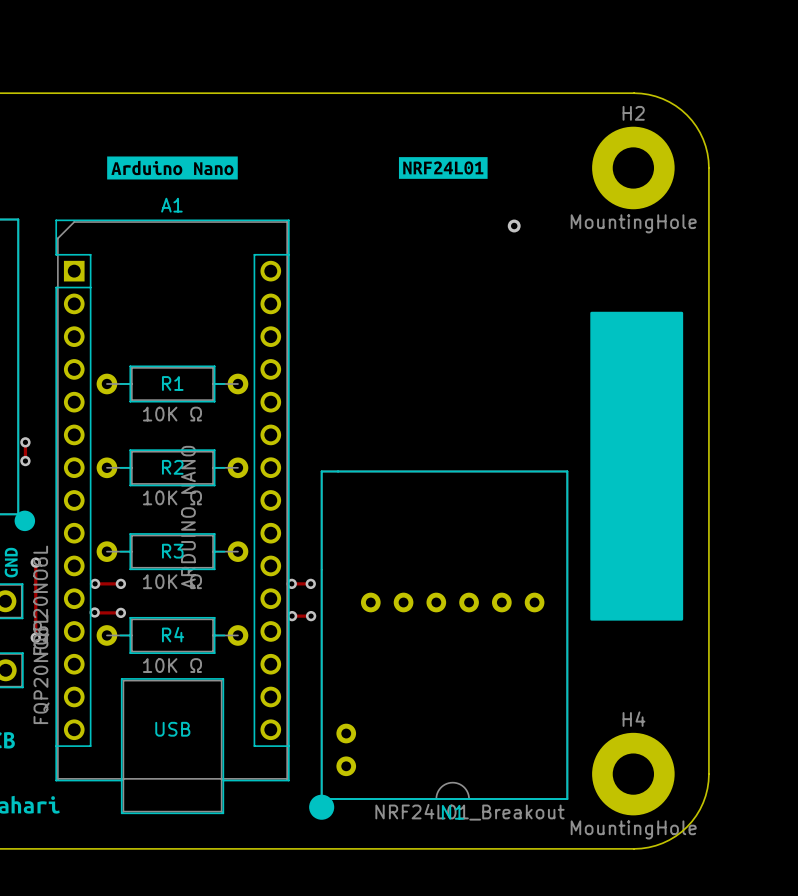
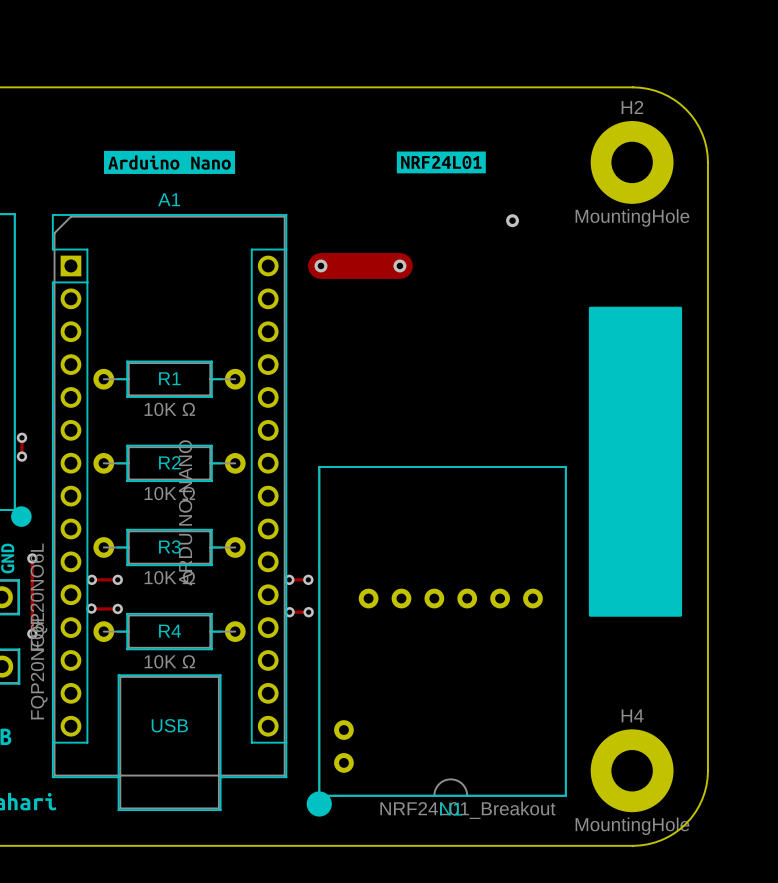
track: none -> (320, 265) (399, 265)
via: none -> (320, 265)
via: none -> (399, 265)

